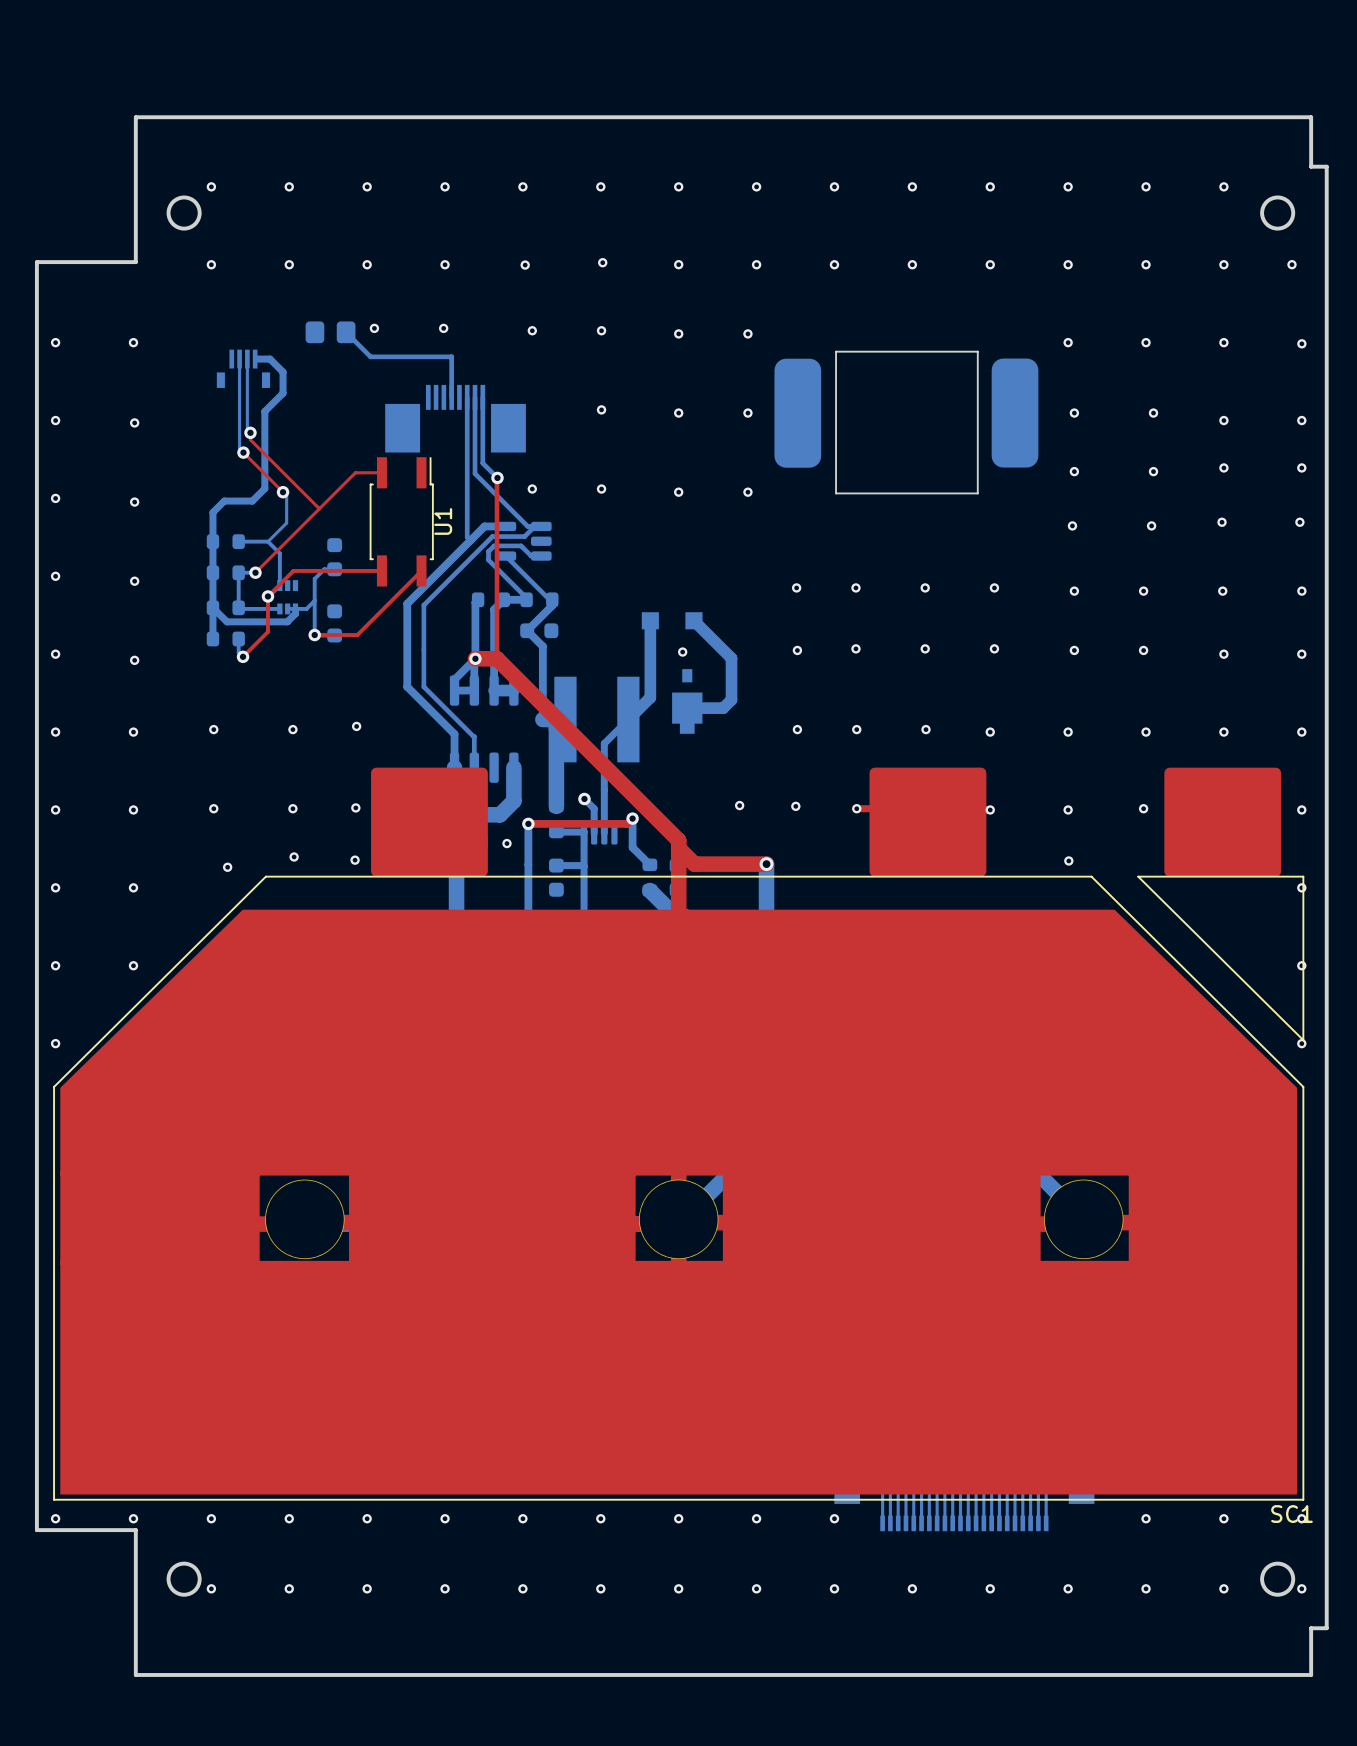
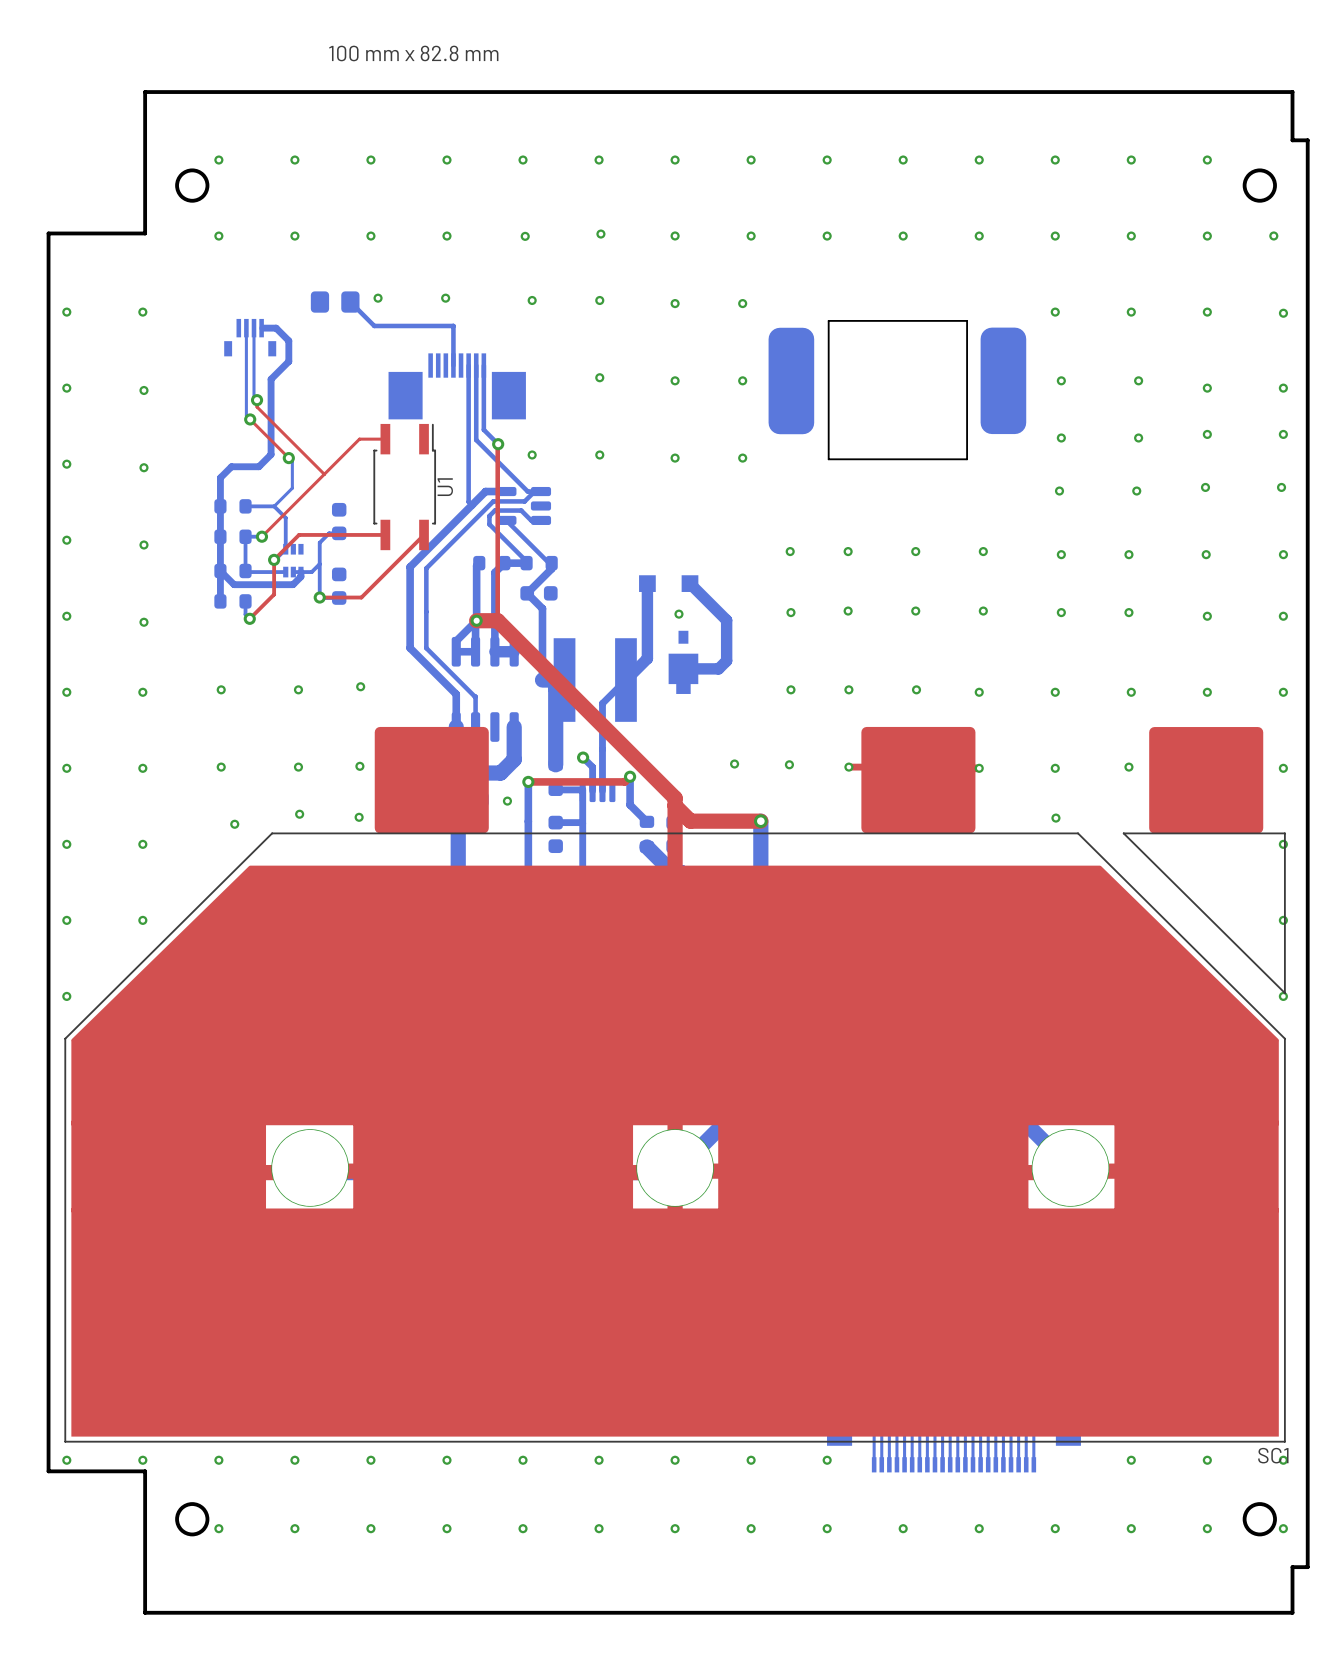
text: none -> 100 mm x 82.8 mm (413, 53)

